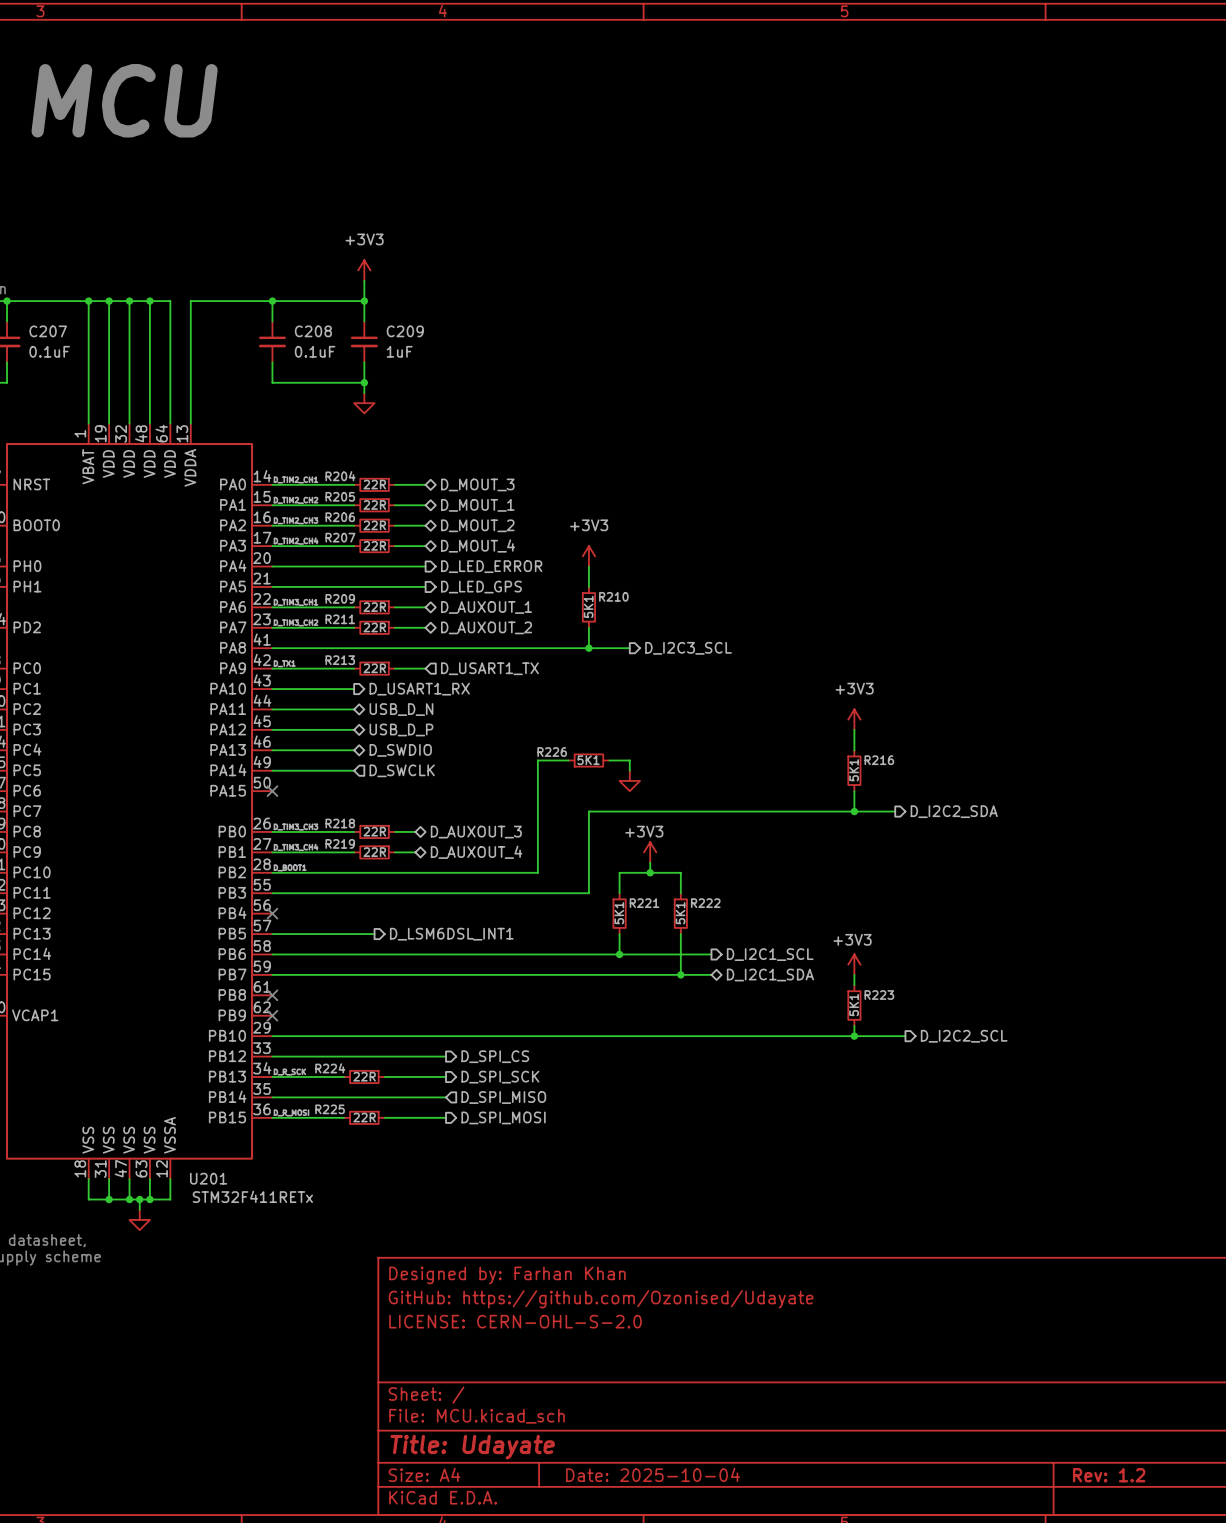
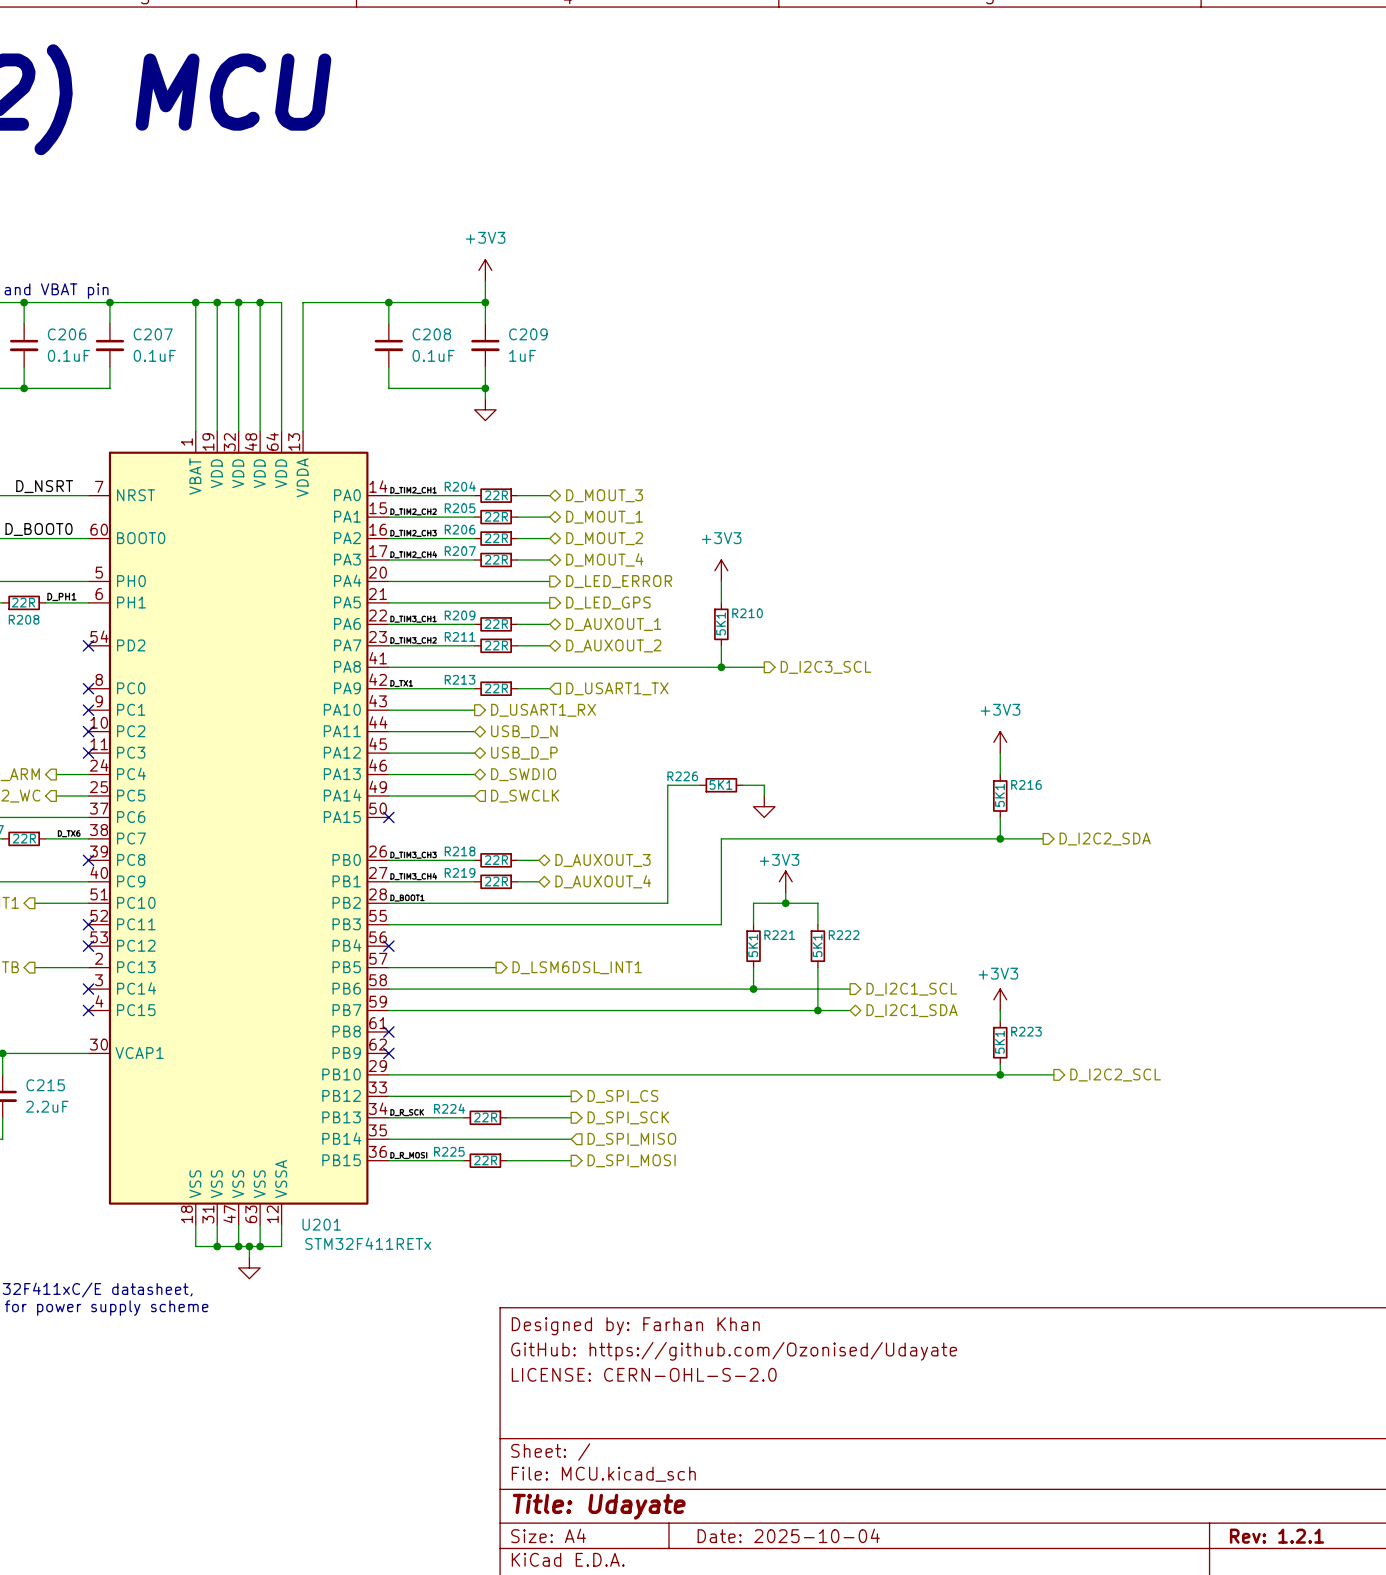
title block: Rev: 1.2 (1109, 1475) -> Rev: 1.2.1 (1276, 1536)

